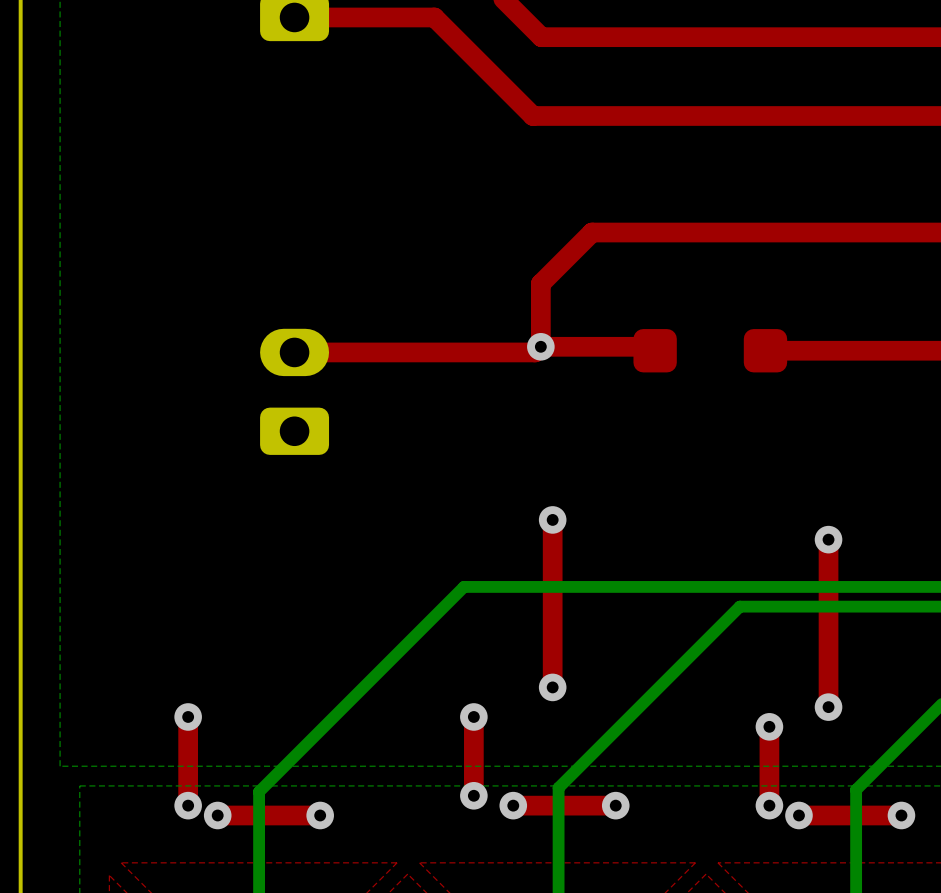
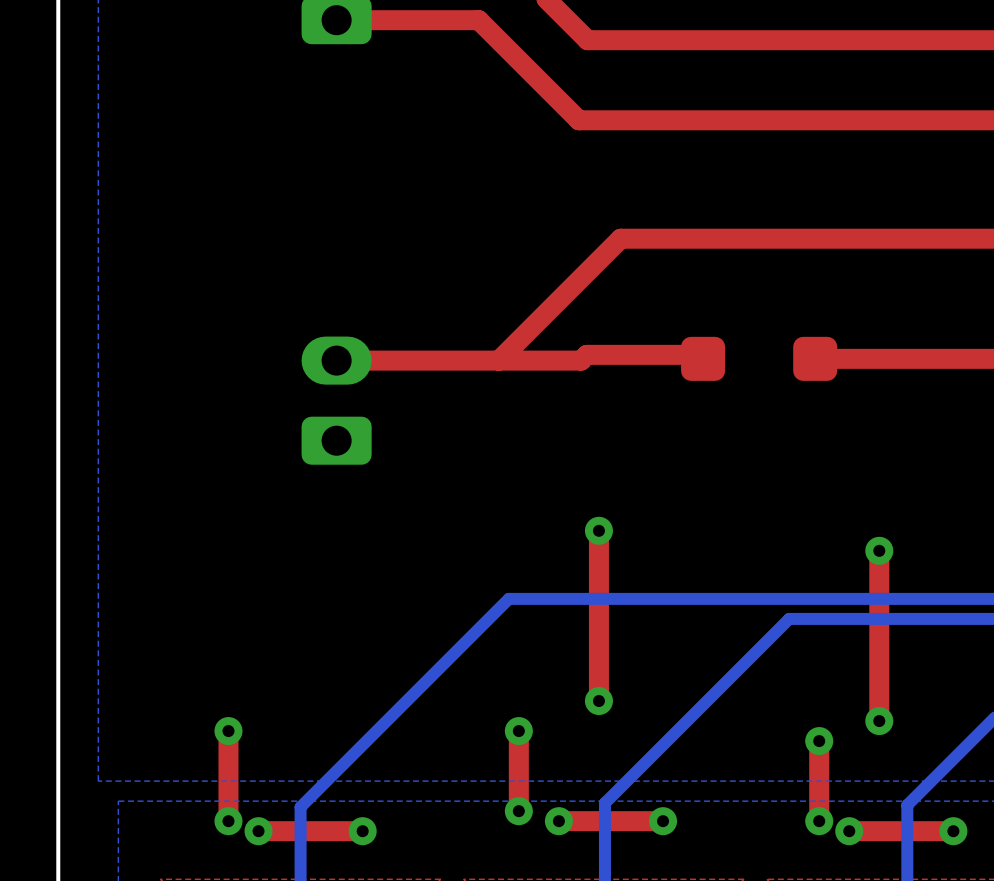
top track: (592, 232) (540, 283) (540, 346) -> (638, 238) (620, 238) (498, 360)
via: (540, 346) -> none

